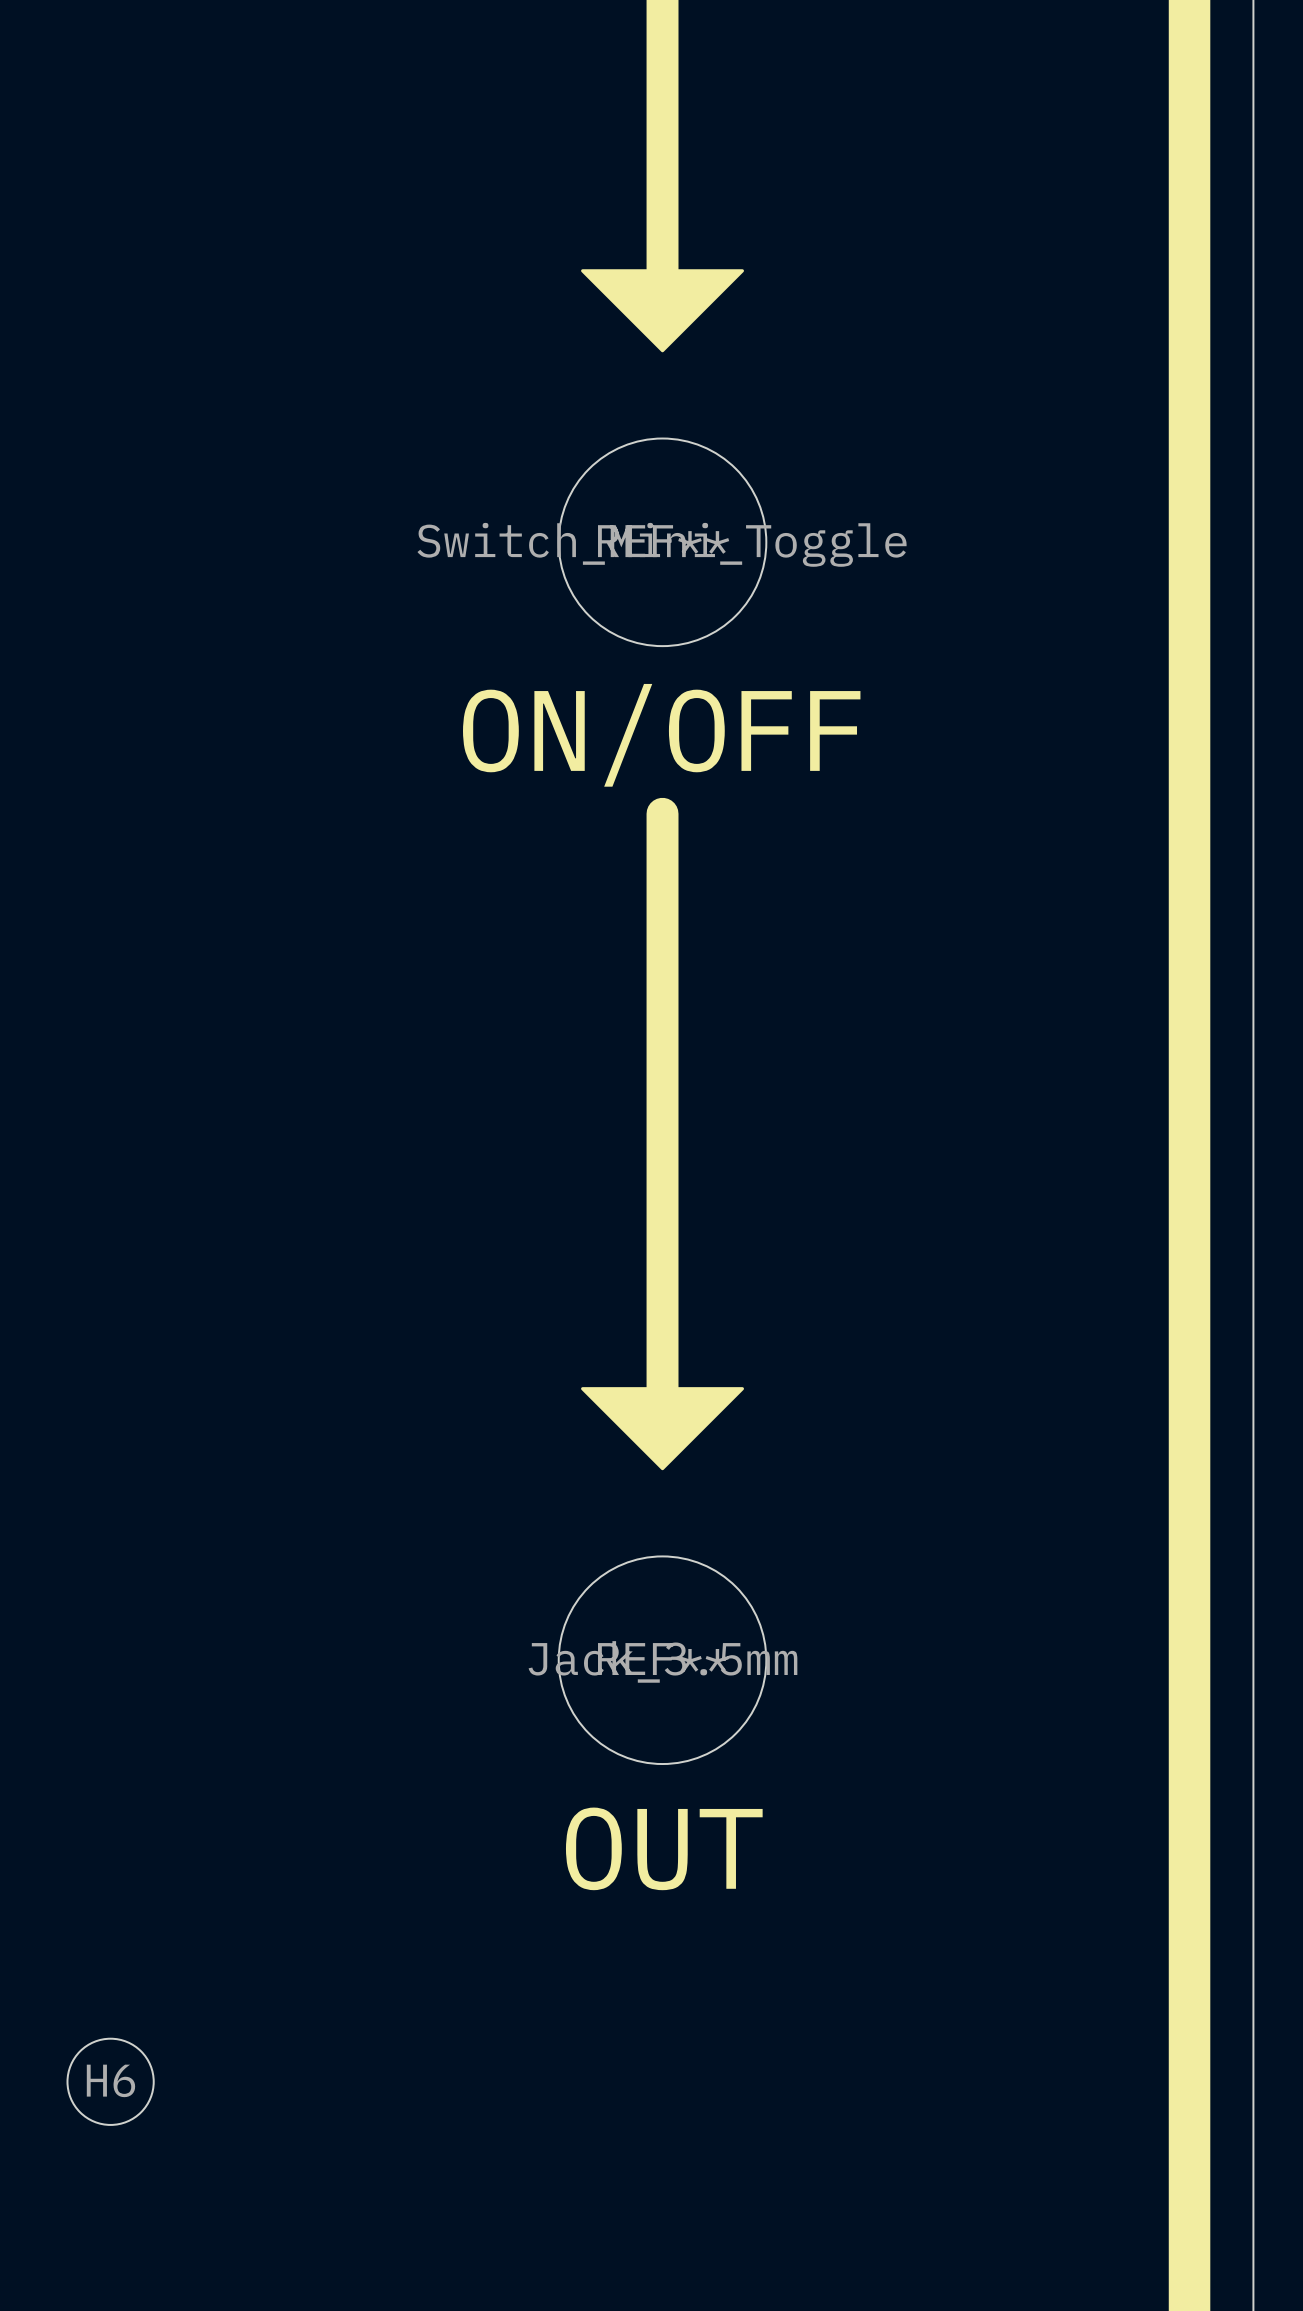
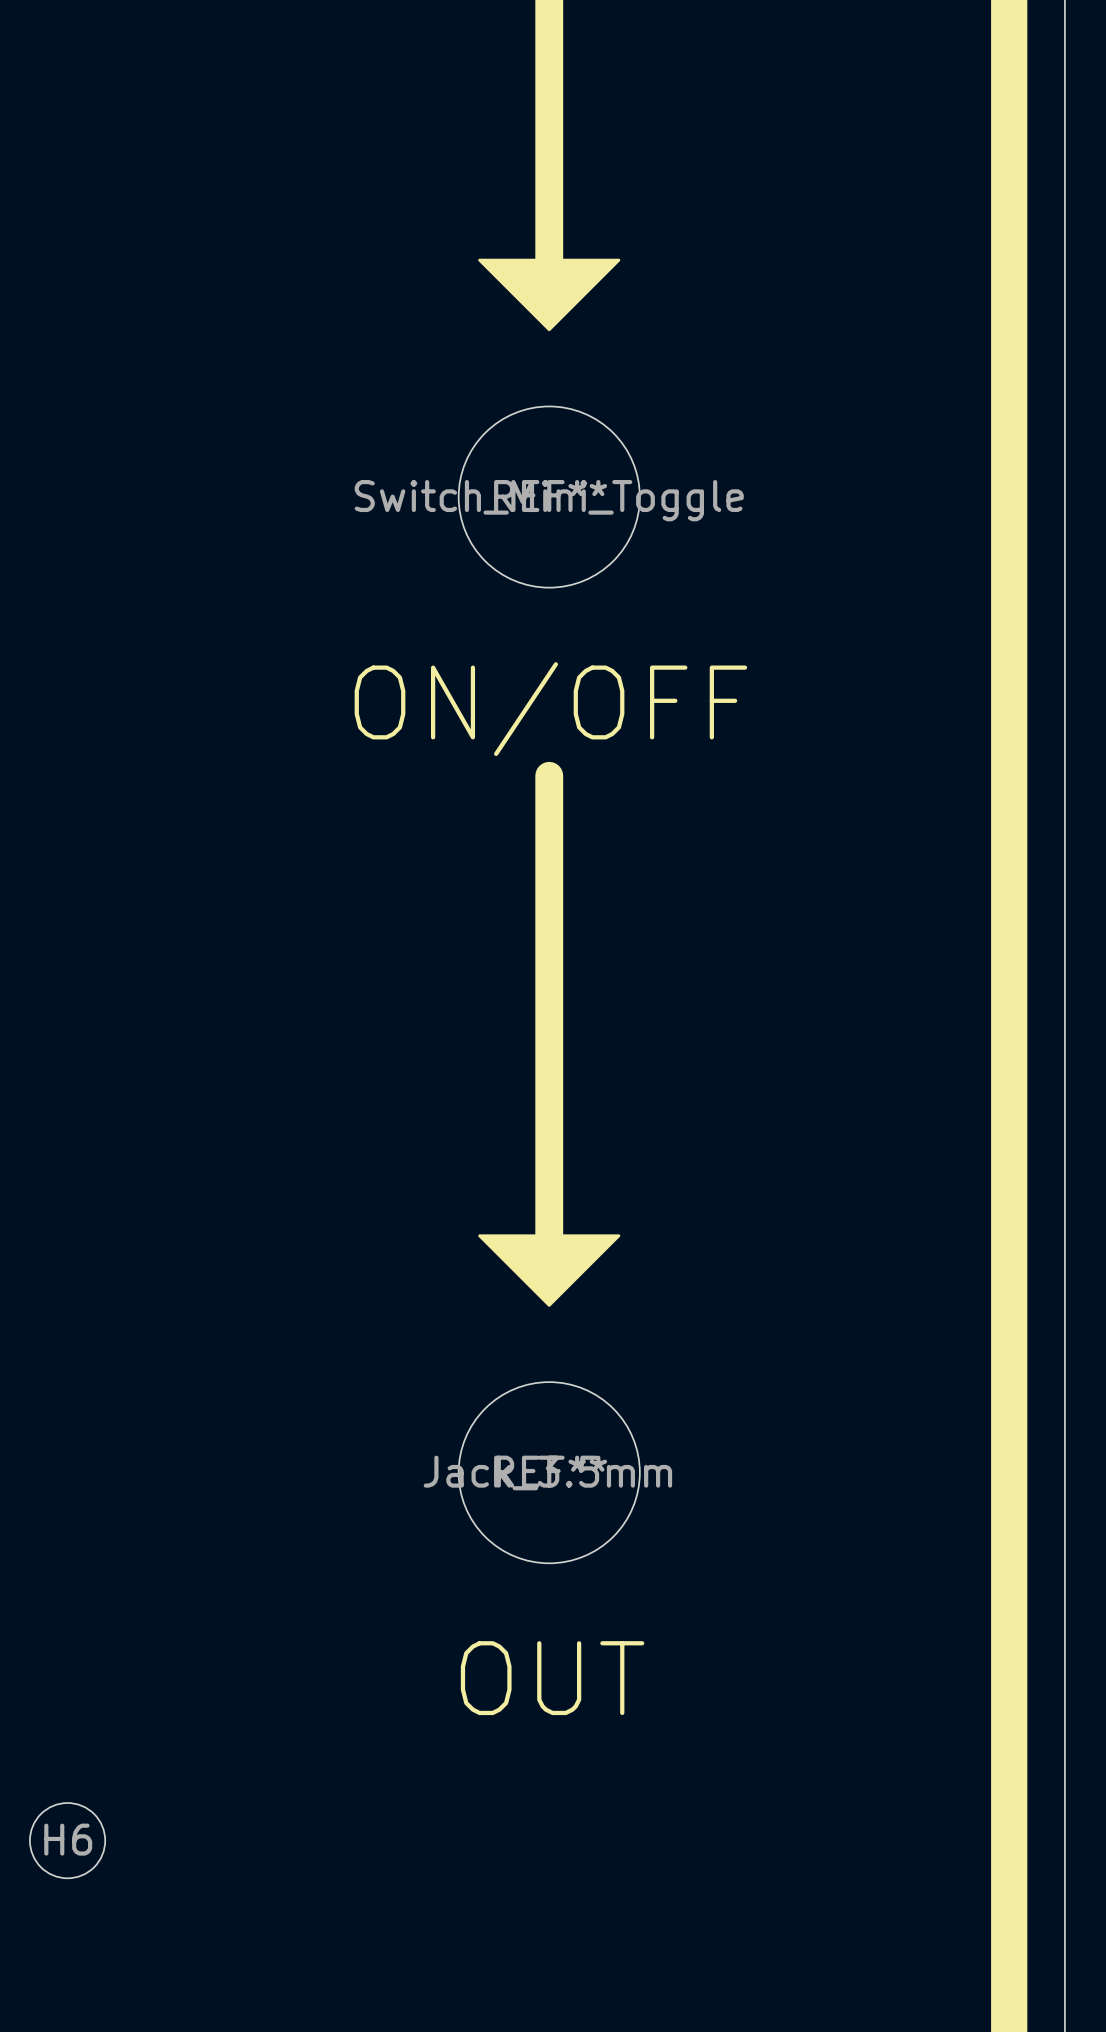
text position: ON/OFF (661, 735) -> ON/OFF (550, 709)
line: (662, 813) (662, 861) -> none
text position: OUT (664, 1848) -> OUT (552, 1678)

